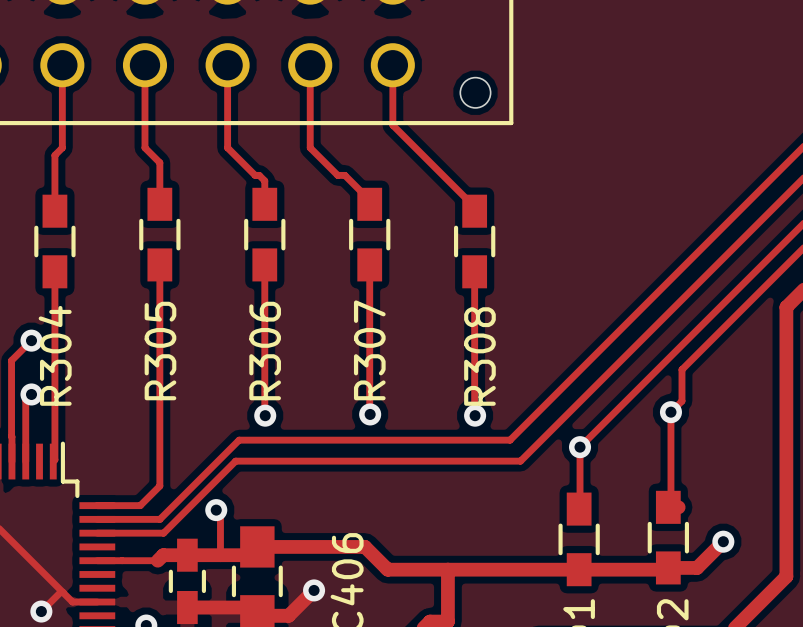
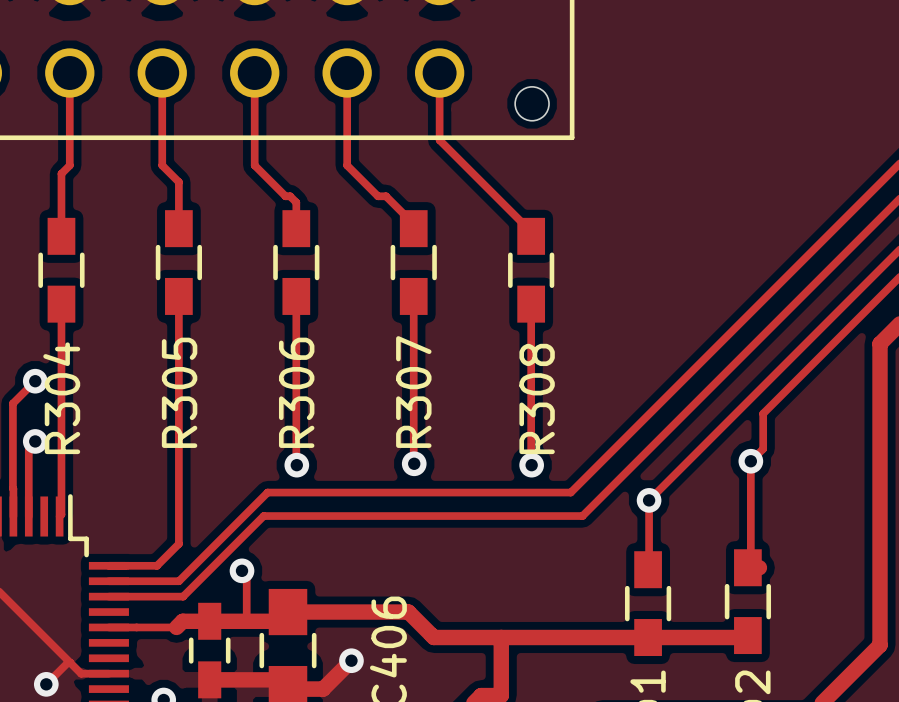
track: (723, 541) (697, 567) (668, 567) -> none
via: (723, 541) -> none

